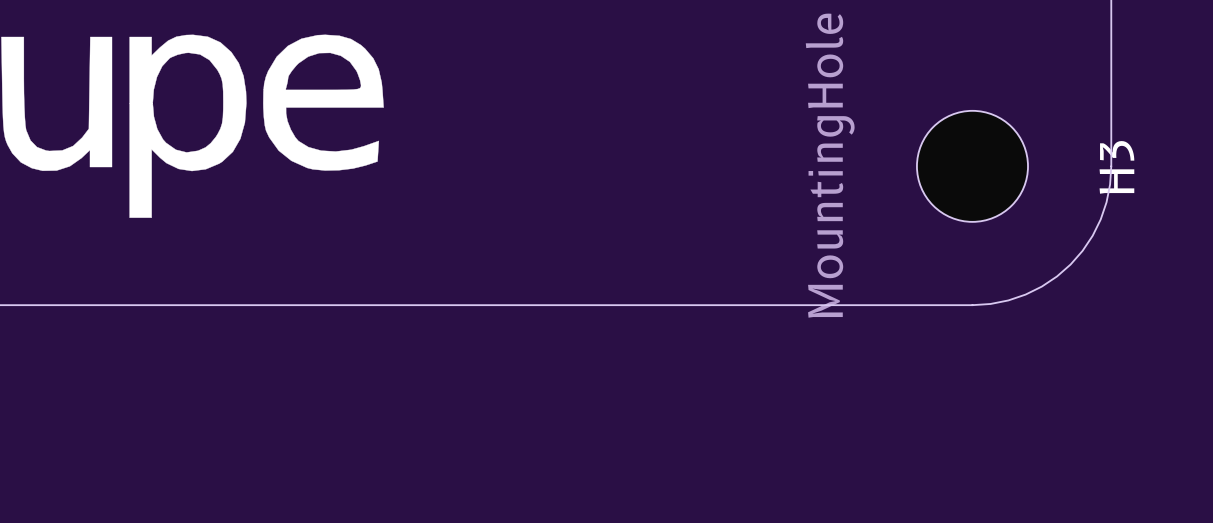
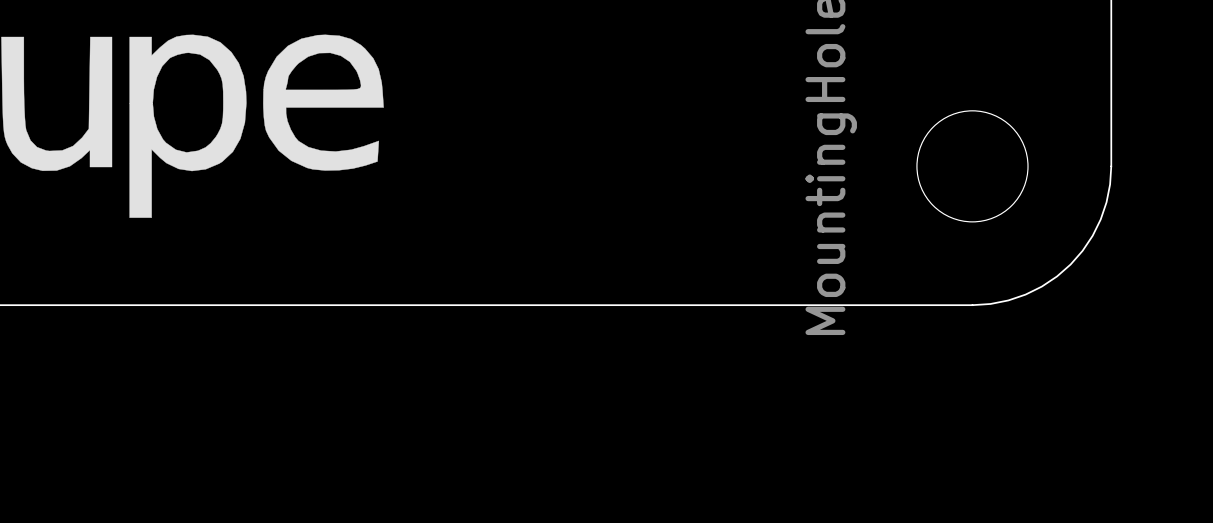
H3 name: H3 (1116, 167) -> none

